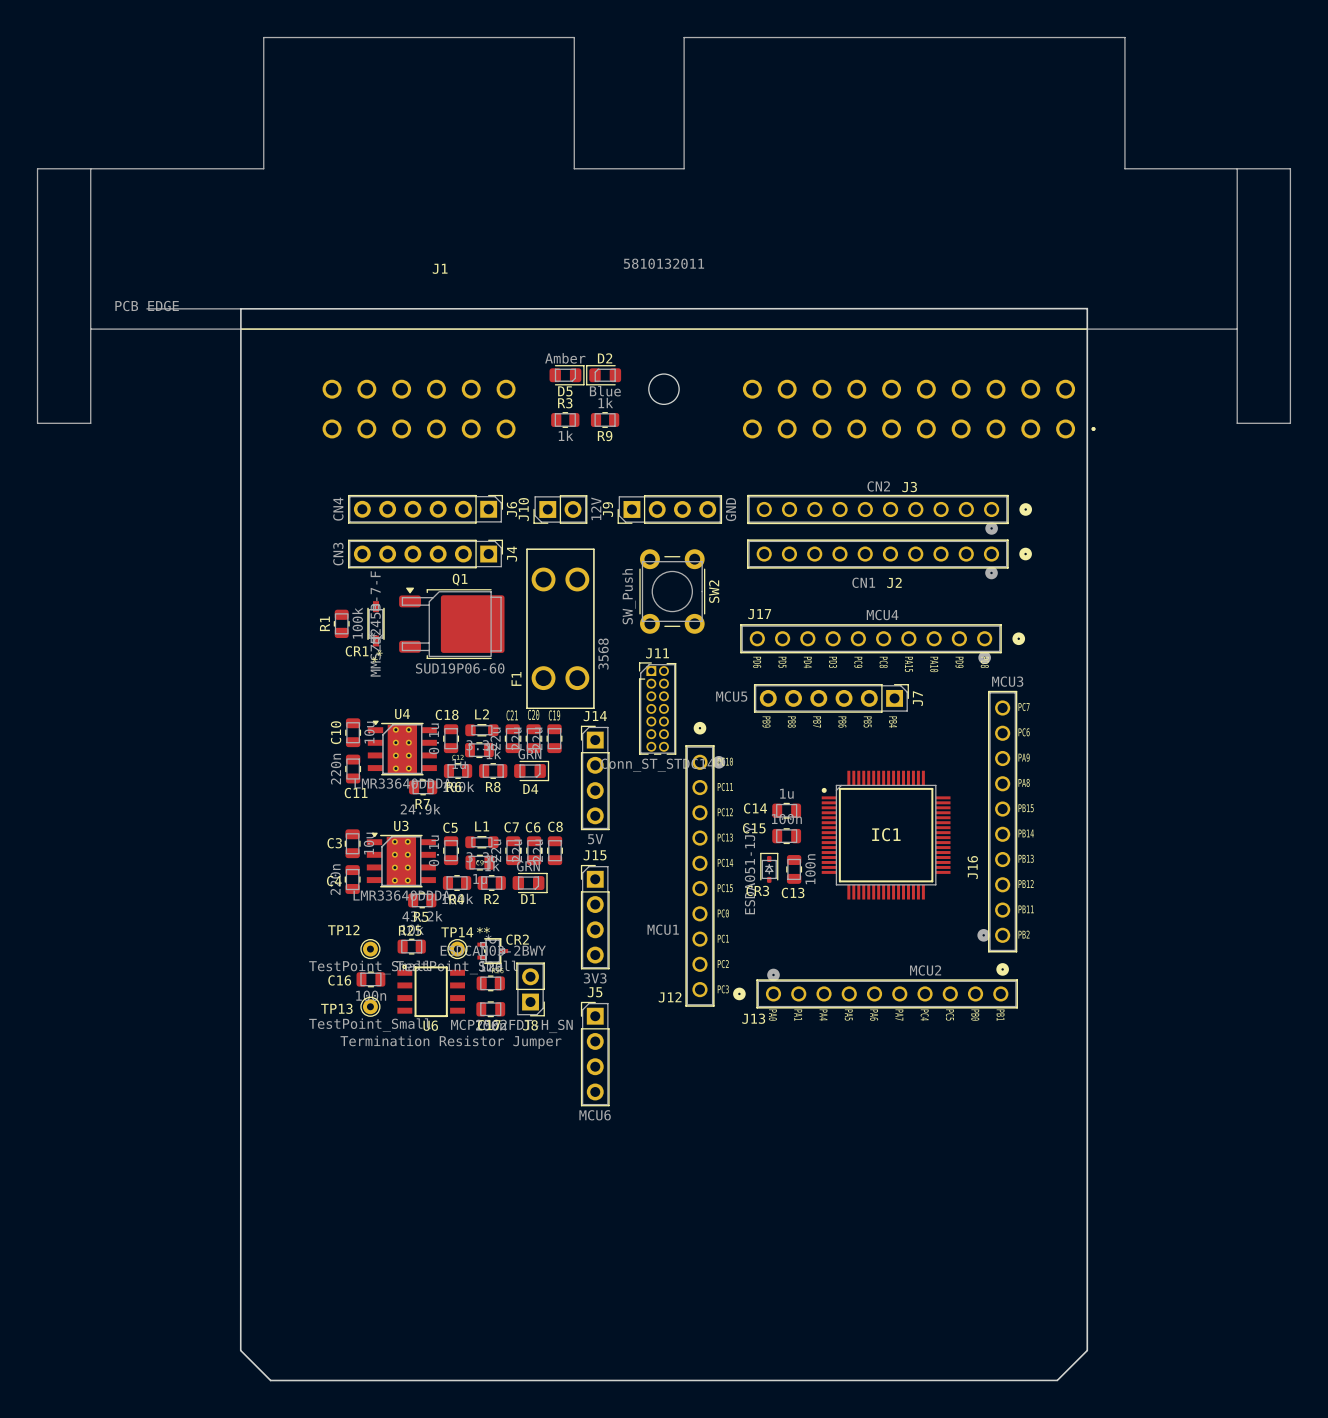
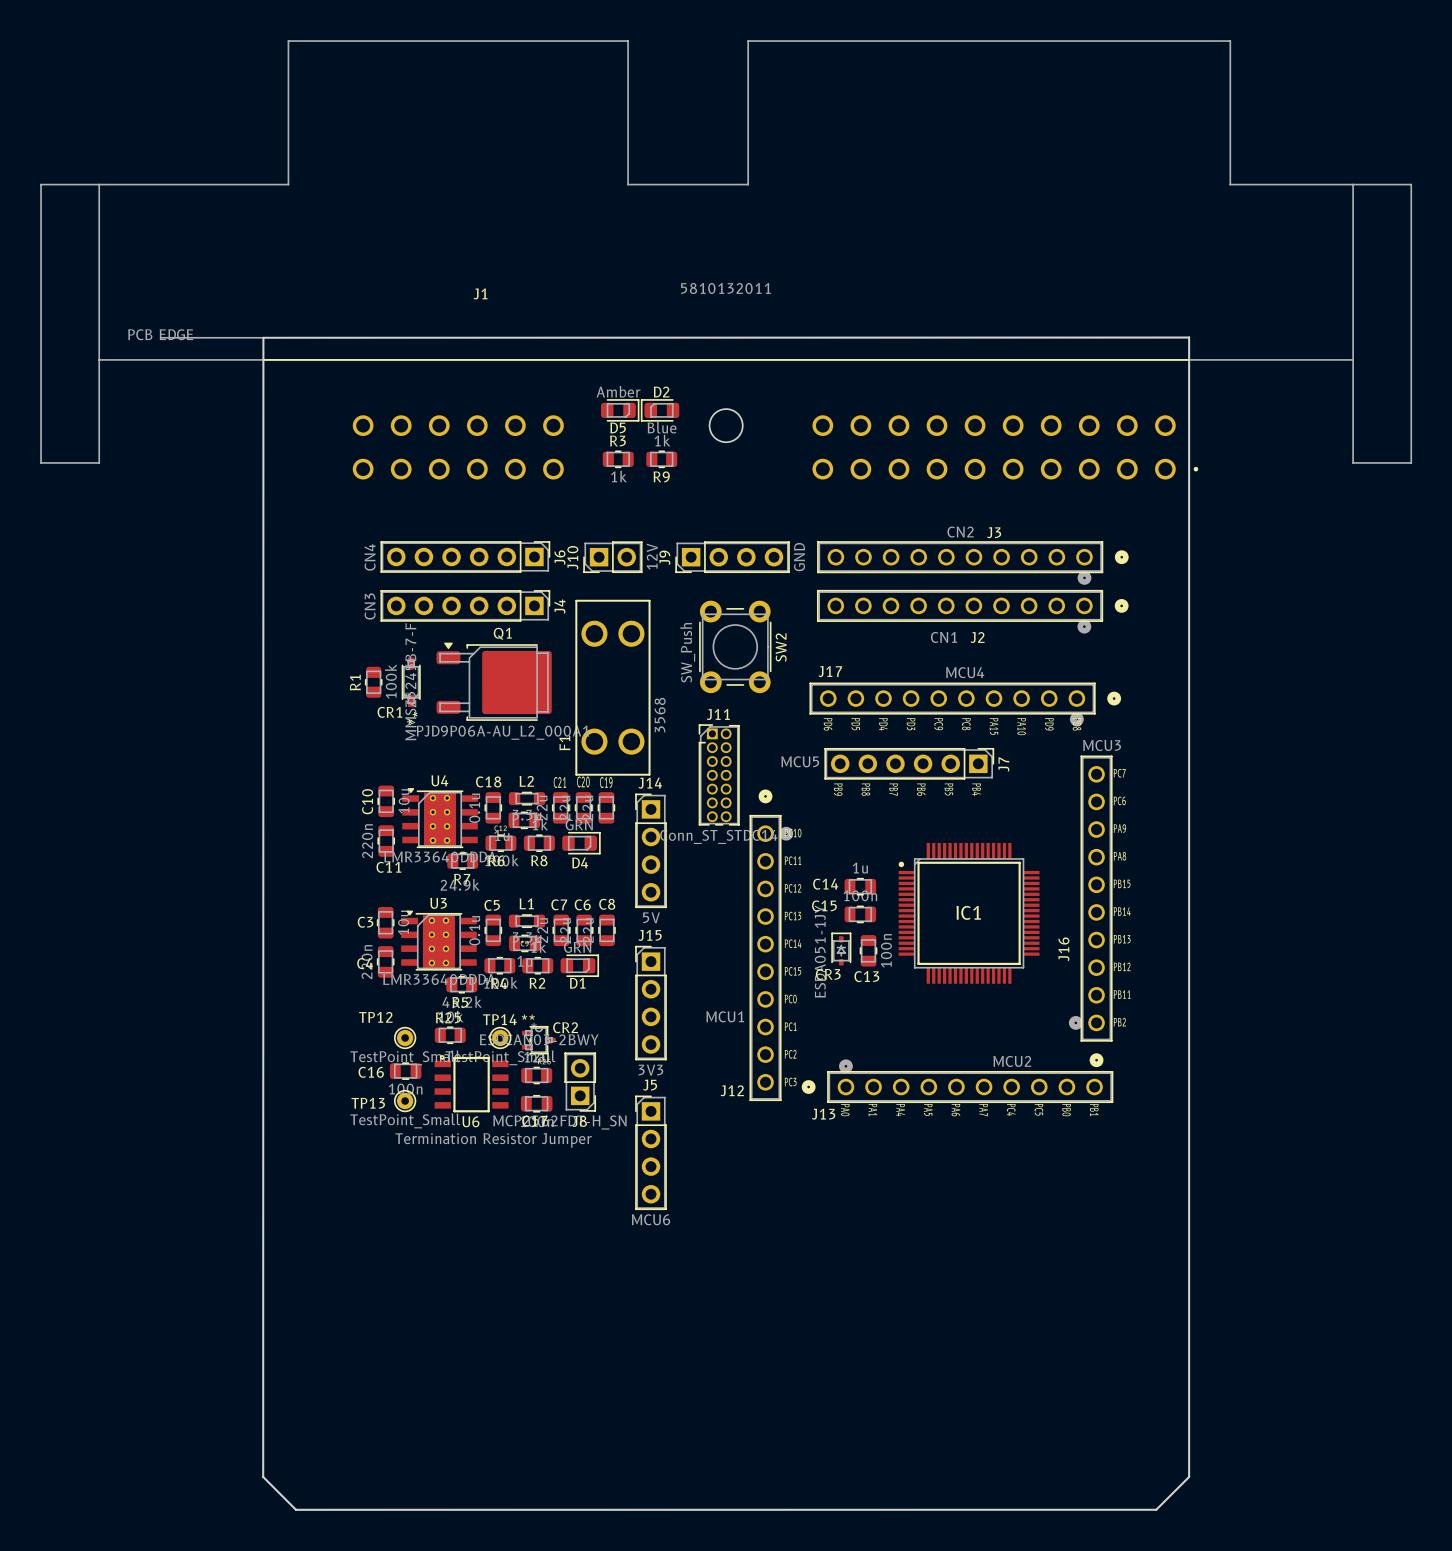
Q1 value: SUD19P06-60 (460, 668) -> PJD9P06A-AU_L2_000A1 (502, 732)

